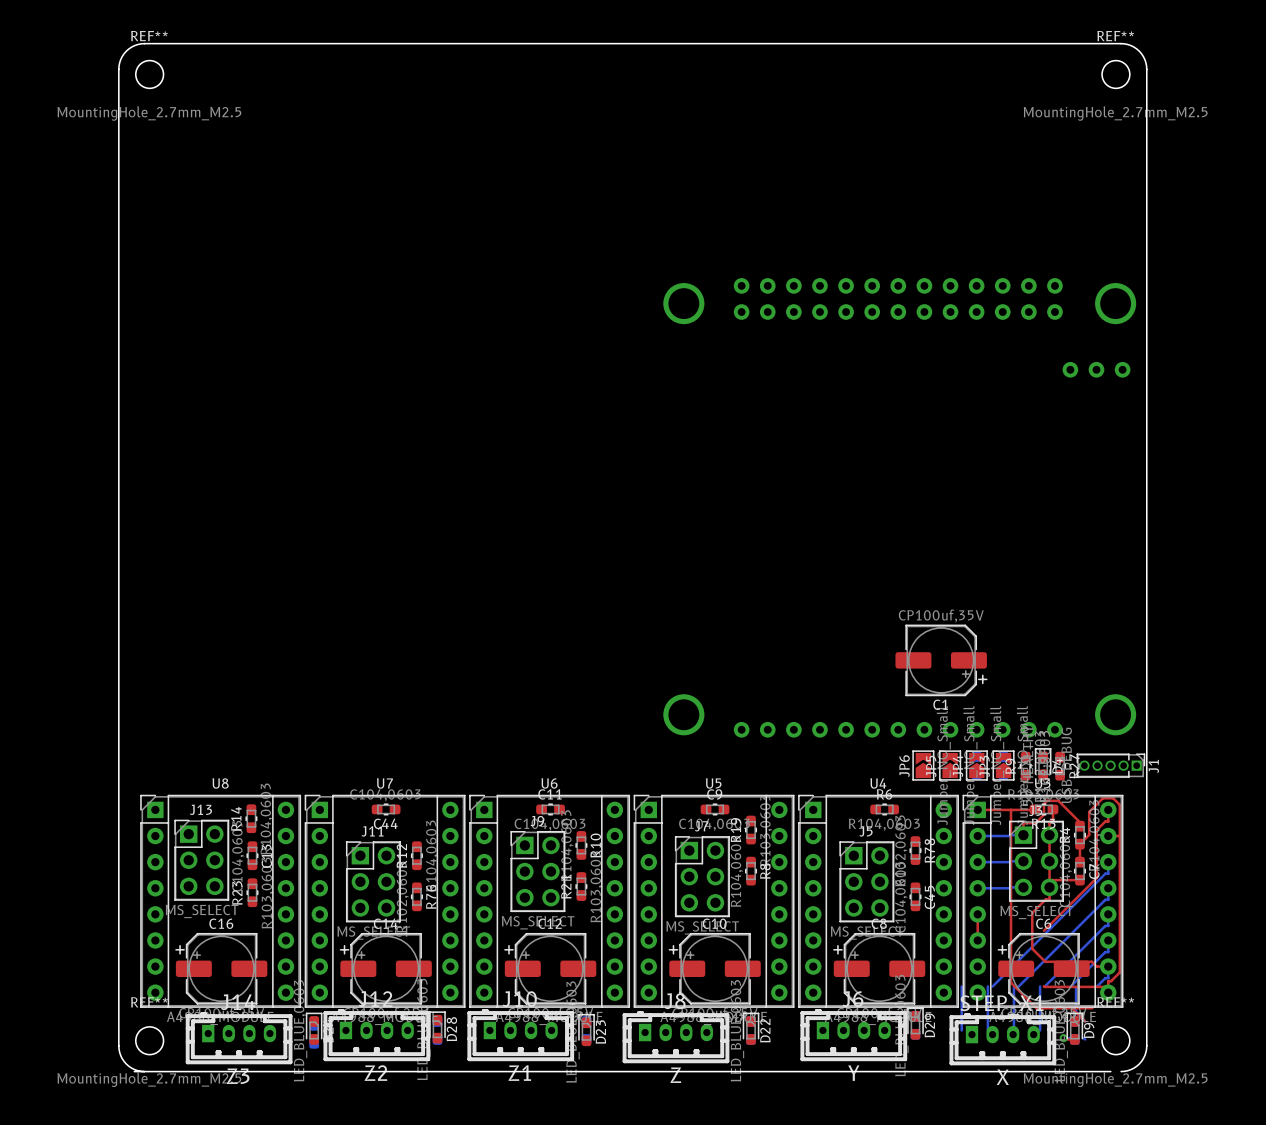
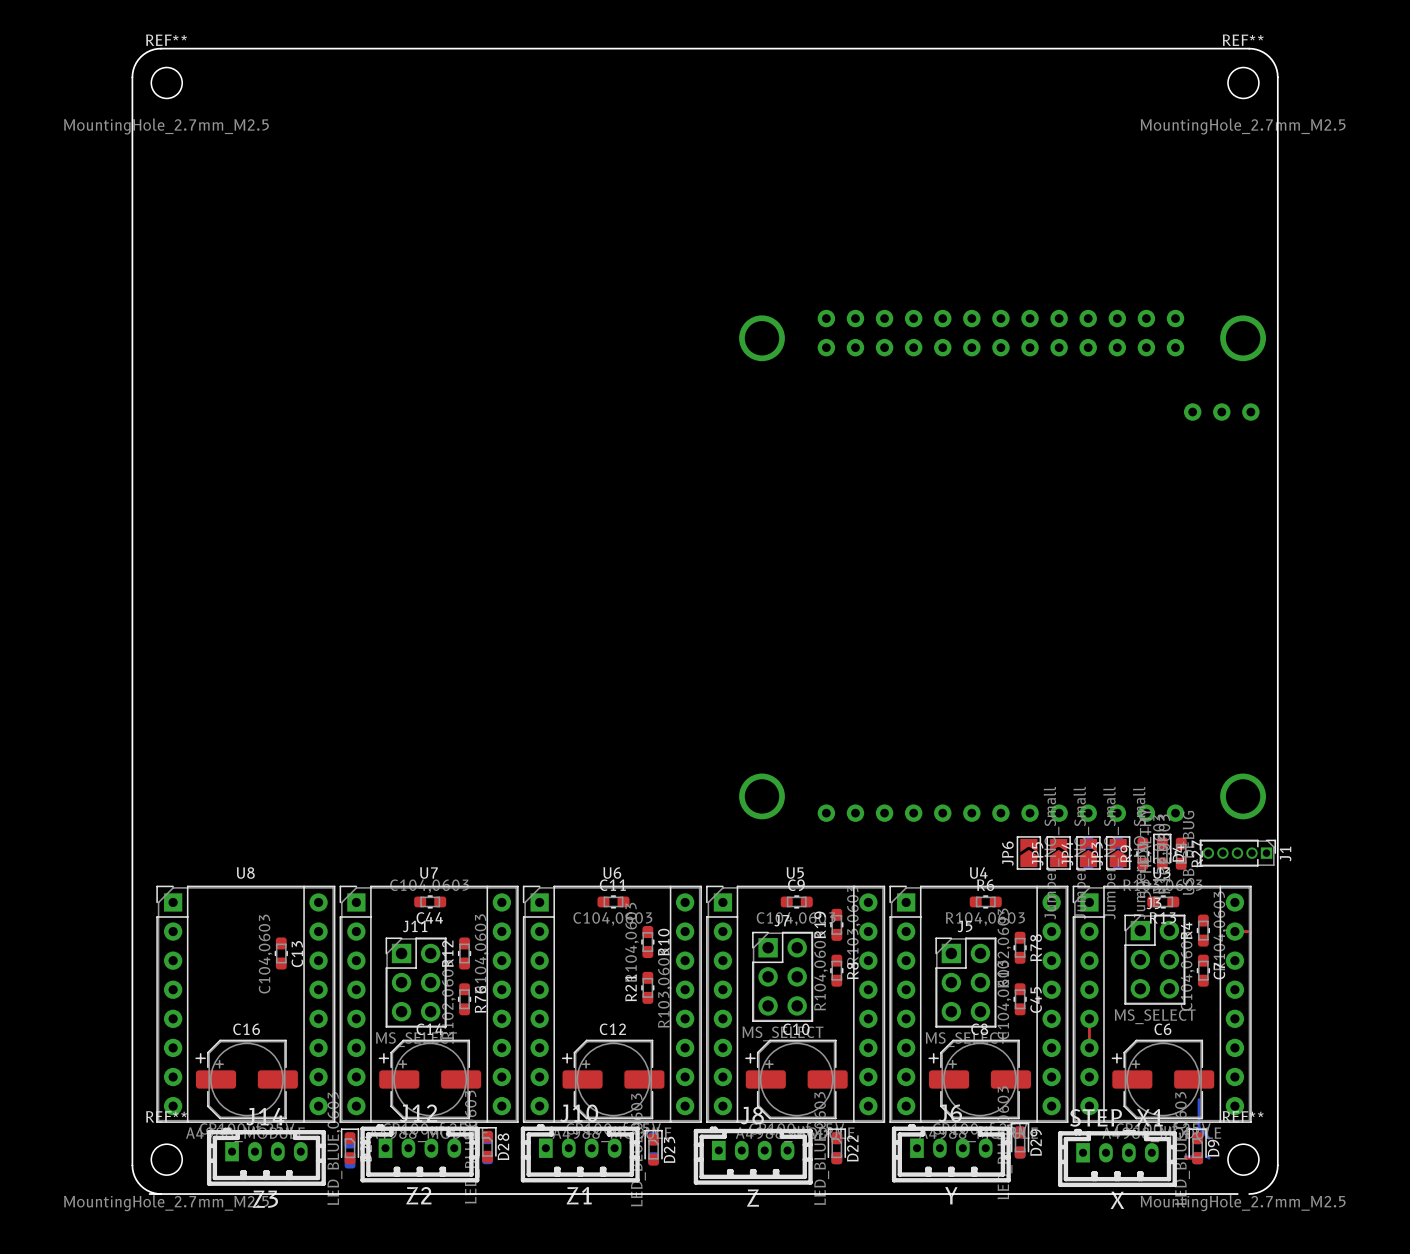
C1: CP100uf,35V (941, 660) -> none
top track: (1011, 809) (1011, 982) (1036, 1008) (1092, 1008) -> none
top track: (1034, 809) (977, 809) -> none
top track: (1052, 809) (1052, 819) (1049, 823) (1049, 899) (1045, 899) (1032, 912) (1032, 948) (1045, 961) (1091, 961) (1096, 966) (1108, 966) -> none
top track: (1108, 809) (1108, 821) (1105, 821) (1096, 830) (1096, 878) (1043, 930) -> none
R14: R104,0603 (251, 818) -> none
top track: (1079, 826) (1079, 822) (1058, 800) (1047, 800) (1043, 803) (1043, 814) (1035, 823) (1023, 823) (1023, 835) -> none
bottom track: (1023, 835) (977, 836) -> none
J13: MS_SELECT (201, 860) -> none
bottom track: (1023, 861) (977, 862) -> none
top track: (1079, 862) (1079, 844) (1089, 834) (1089, 811) (1102, 798) (1113, 798) (1119, 804) (1119, 972) (1111, 981) (1108, 981) (1108, 992) -> none
bottom track: (1108, 862) (1108, 873) (1105, 873) (992, 986) -> none
J9: MS_SELECT (537, 871) -> none
top track: (1049, 880) (1079, 880) -> none
bottom track: (1023, 887) (977, 888) -> none
bottom track: (1108, 888) (1108, 899) (1105, 899) (1018, 986) -> none
R23: R103,0603 (252, 892) -> none
bottom track: (1108, 914) (1108, 925) (1105, 925) (1044, 986) -> none
bottom track: (1108, 940) (1108, 952) (1105, 952) (1070, 986) -> none
bottom track: (1108, 966) (1108, 978) (1105, 978) (1096, 986) -> none
bottom track: (961, 986) (961, 1030) -> none
bottom track: (987, 986) (987, 1030) -> none
bottom track: (1013, 986) (1013, 1030) -> none
bottom track: (1040, 986) (1040, 1030) -> none
top track: (1043, 986) (1108, 986) -> none
top track: (1071, 1008) (1085, 1021) -> none
via: (1063, 1038) -> none

